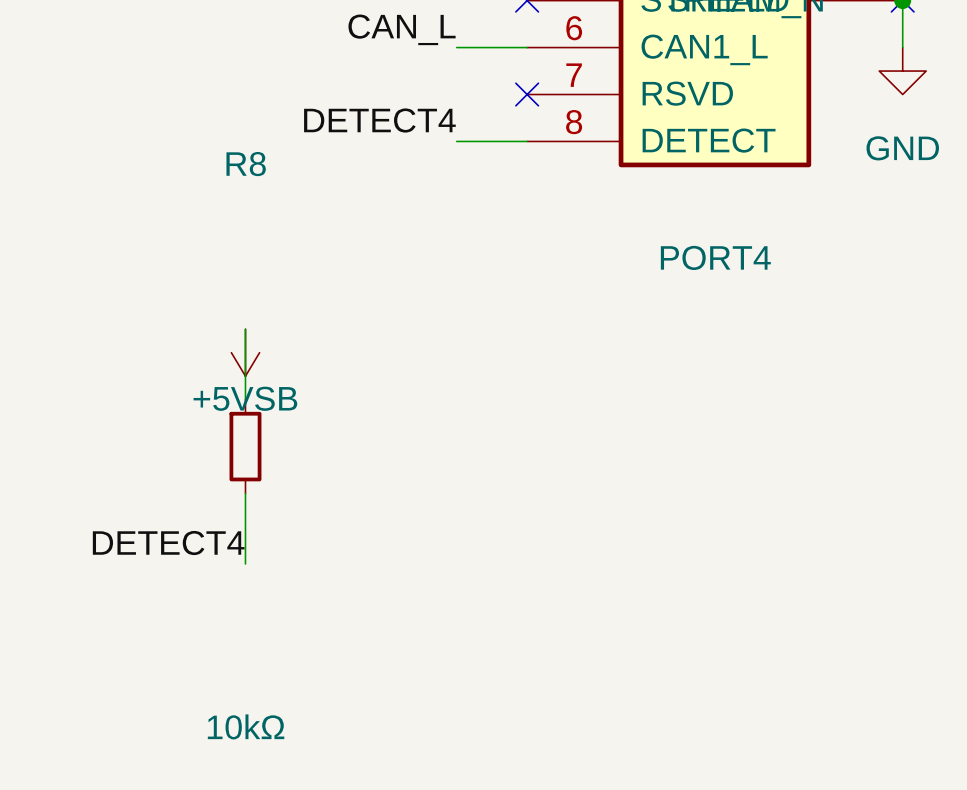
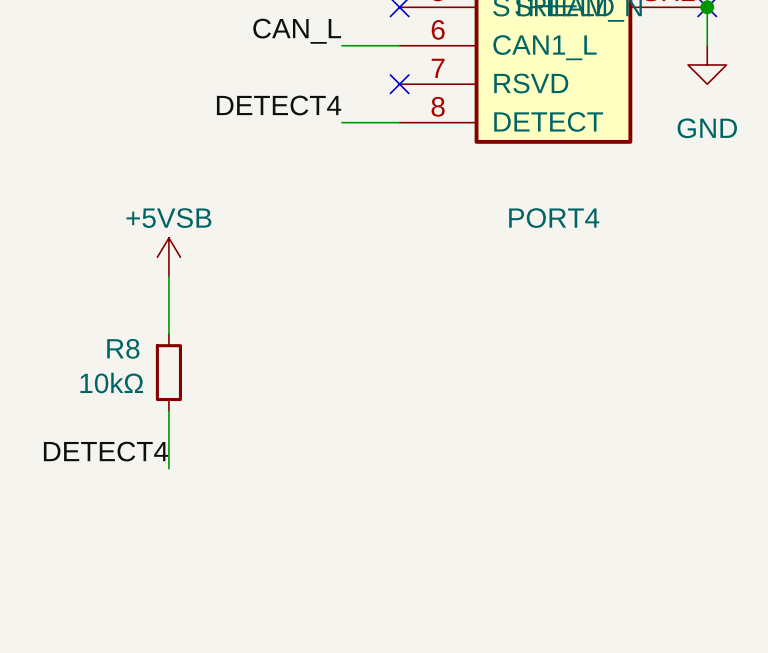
R8 name position: R8 (246, 164) -> R8 (123, 348)
power symbol rotation: 0° (245, 352) -> 180° (168, 257)
power symbol position: +5VSB (245, 352) -> +5VSB (168, 257)
R8 value position: 10kΩ (246, 726) -> 10kΩ (111, 383)

